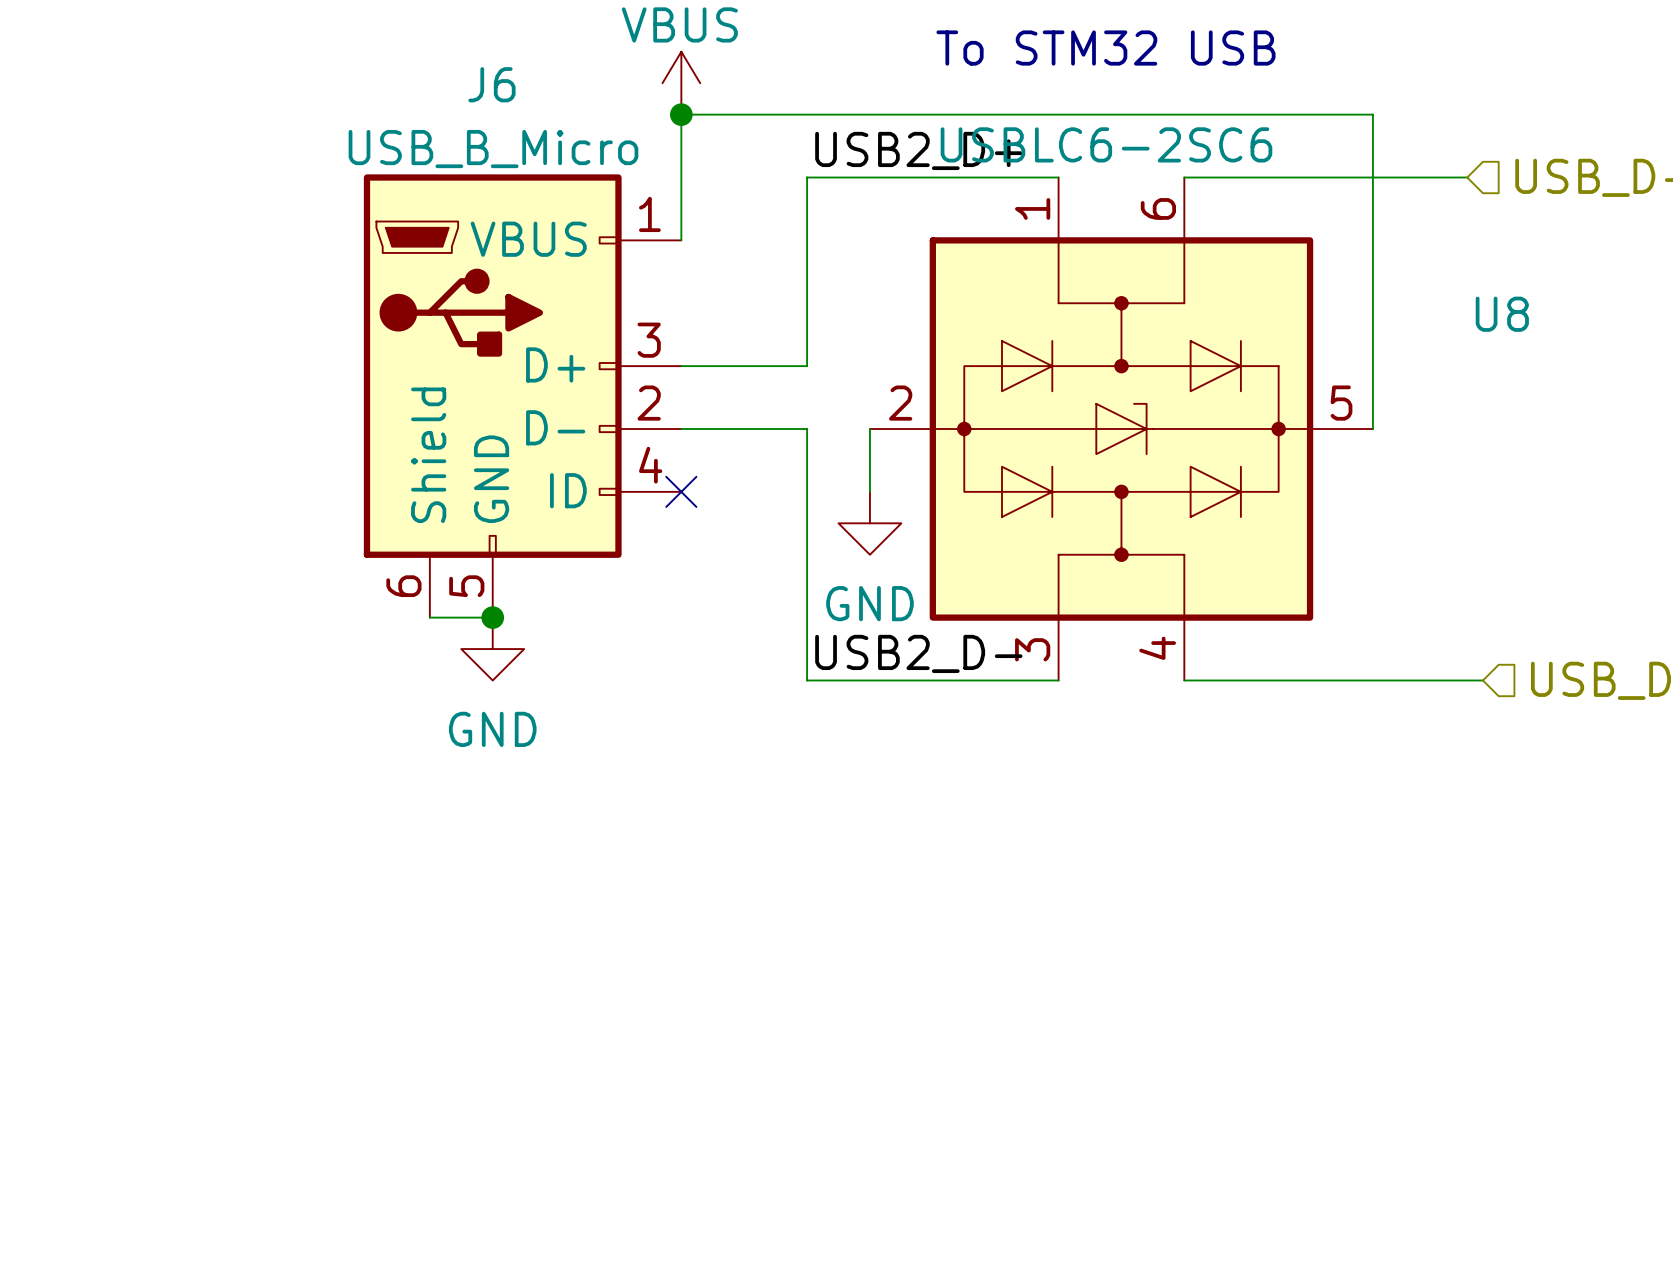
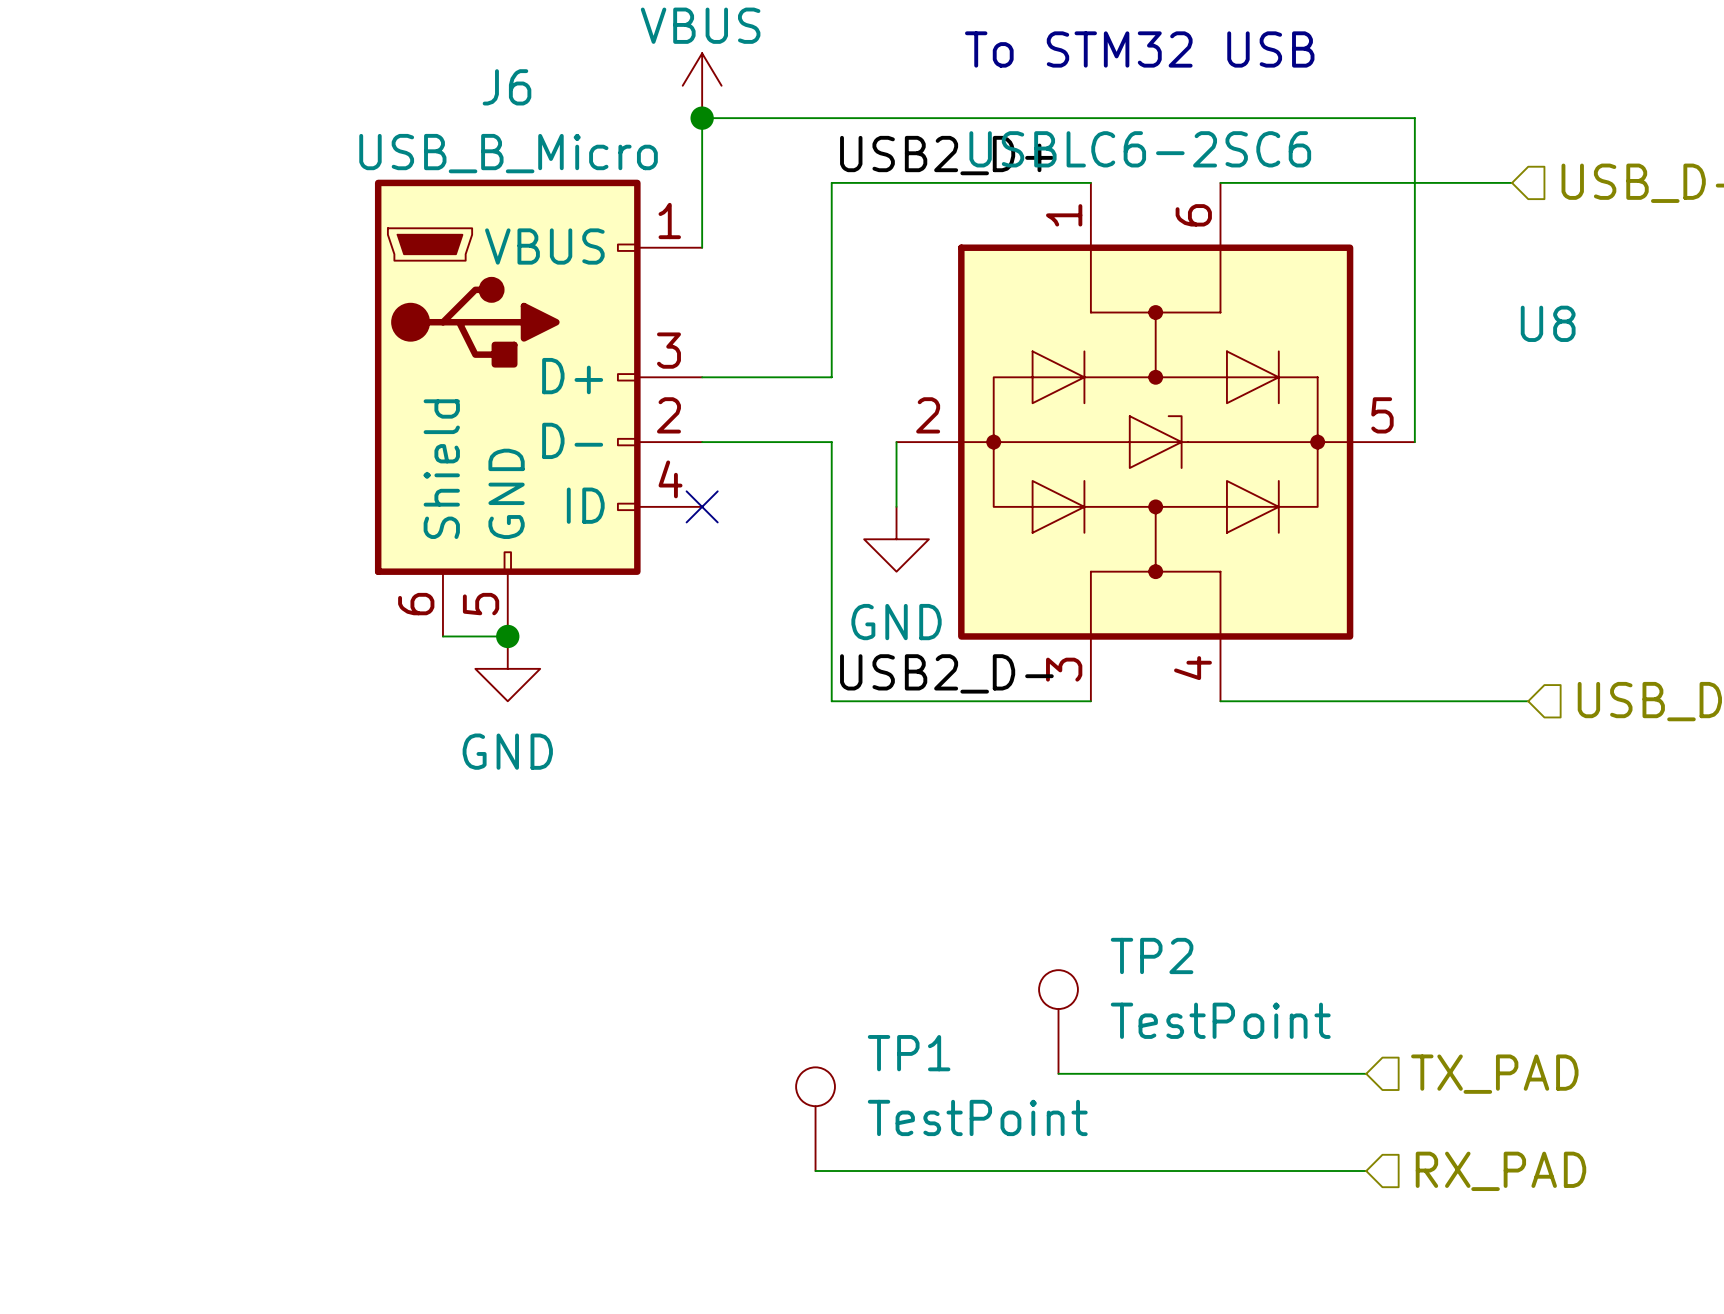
TP2: none -> TestPoint (1058, 1021)
wire: none -> (1058, 1073) (1366, 1073)
hierarchical label: none -> TX_PAD (1494, 1074)
TP1: none -> TestPoint (815, 1119)
wire: none -> (815, 1171) (1366, 1171)
hierarchical label: none -> RX_PAD (1500, 1171)

